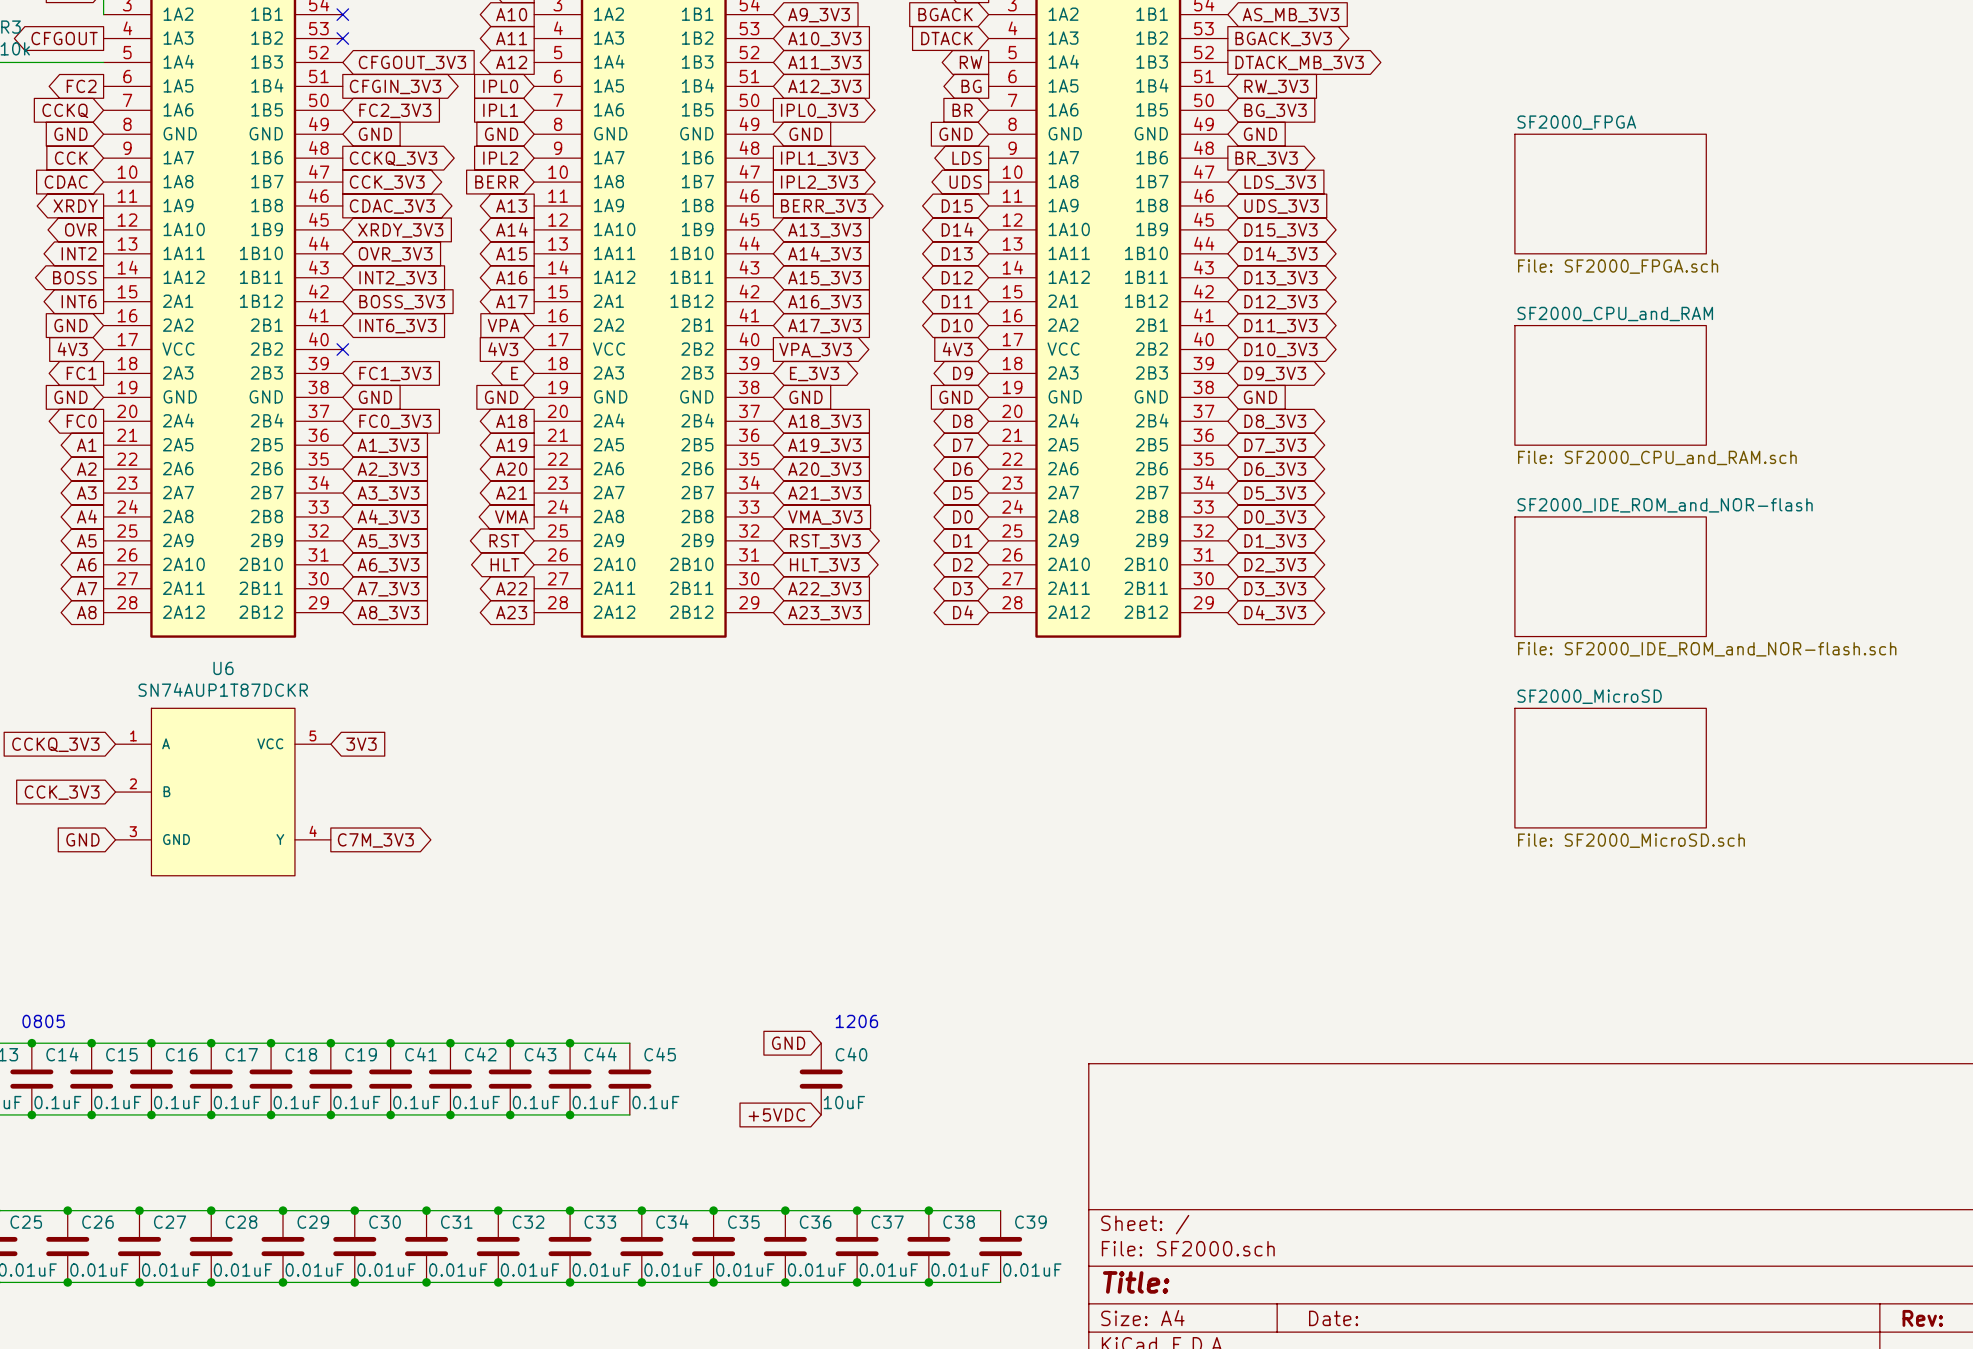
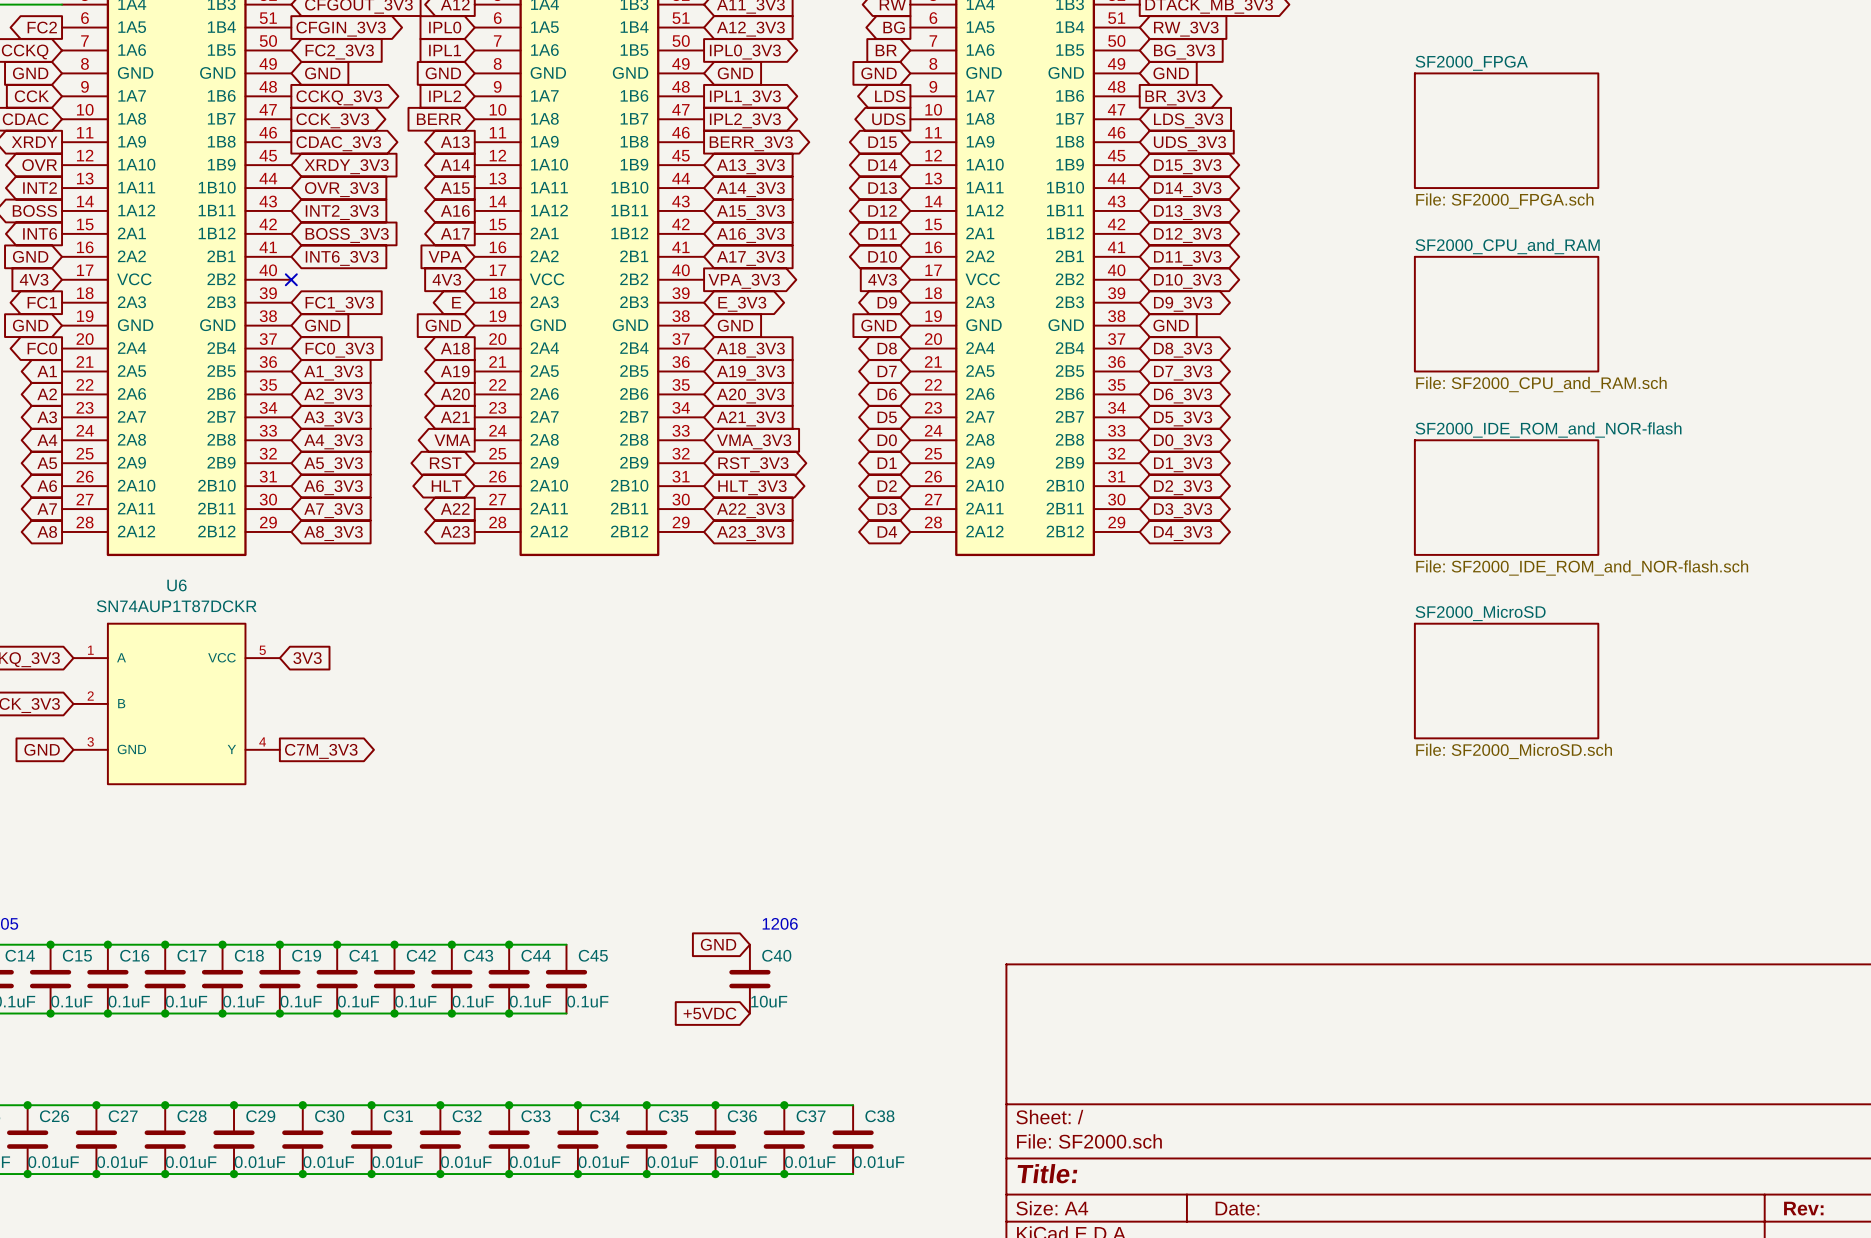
wire: (928, 1210) (1000, 1210) -> none
junction: (928, 1210) -> none
C39: 0.01uF (1000, 1246) -> none
wire: (928, 1282) (1000, 1282) -> none
junction: (928, 1282) -> none

